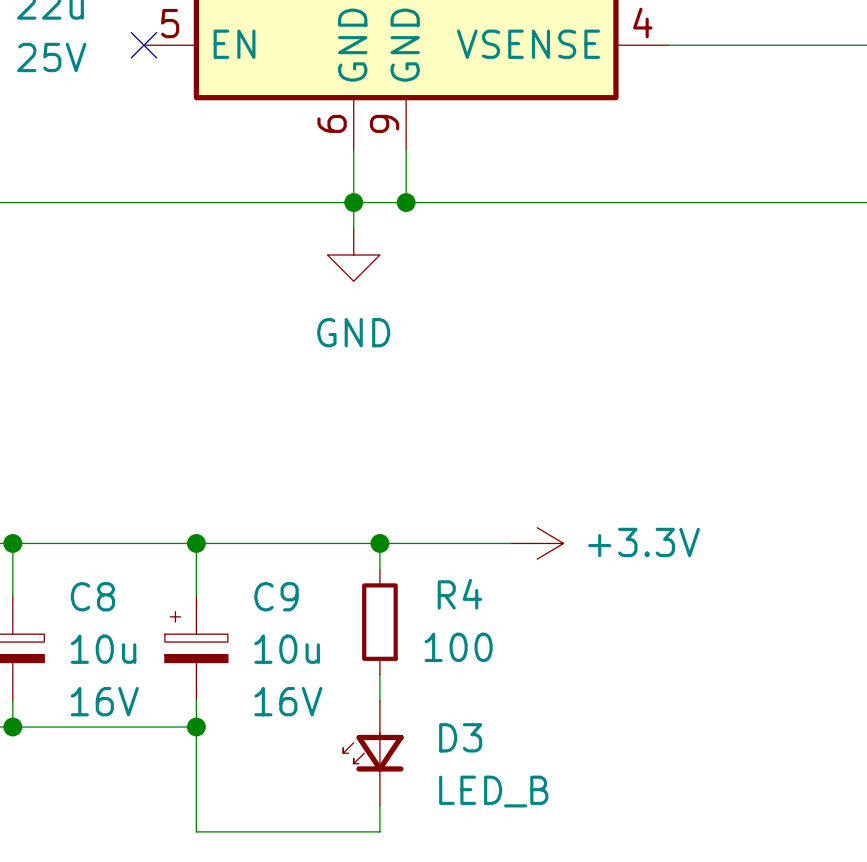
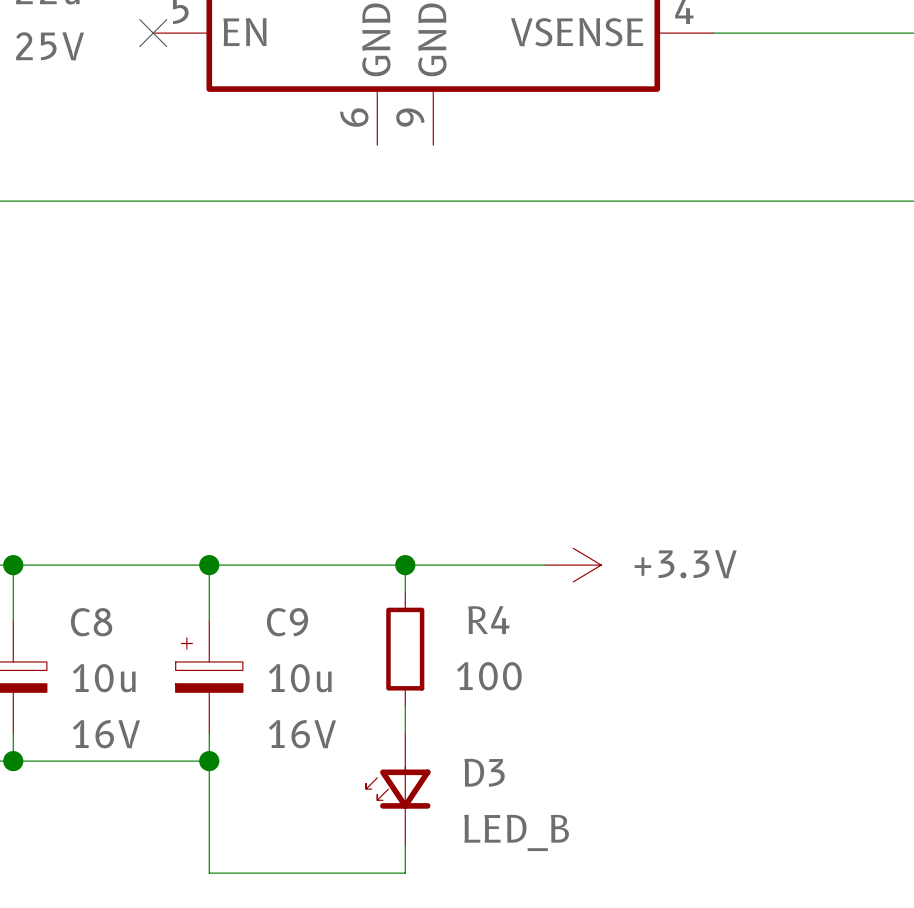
wire: (353, 150) (353, 228) -> none
wire: (406, 150) (406, 202) -> none
junction: (353, 202) -> none
junction: (406, 202) -> none
power symbol: GND (353, 255) -> none

